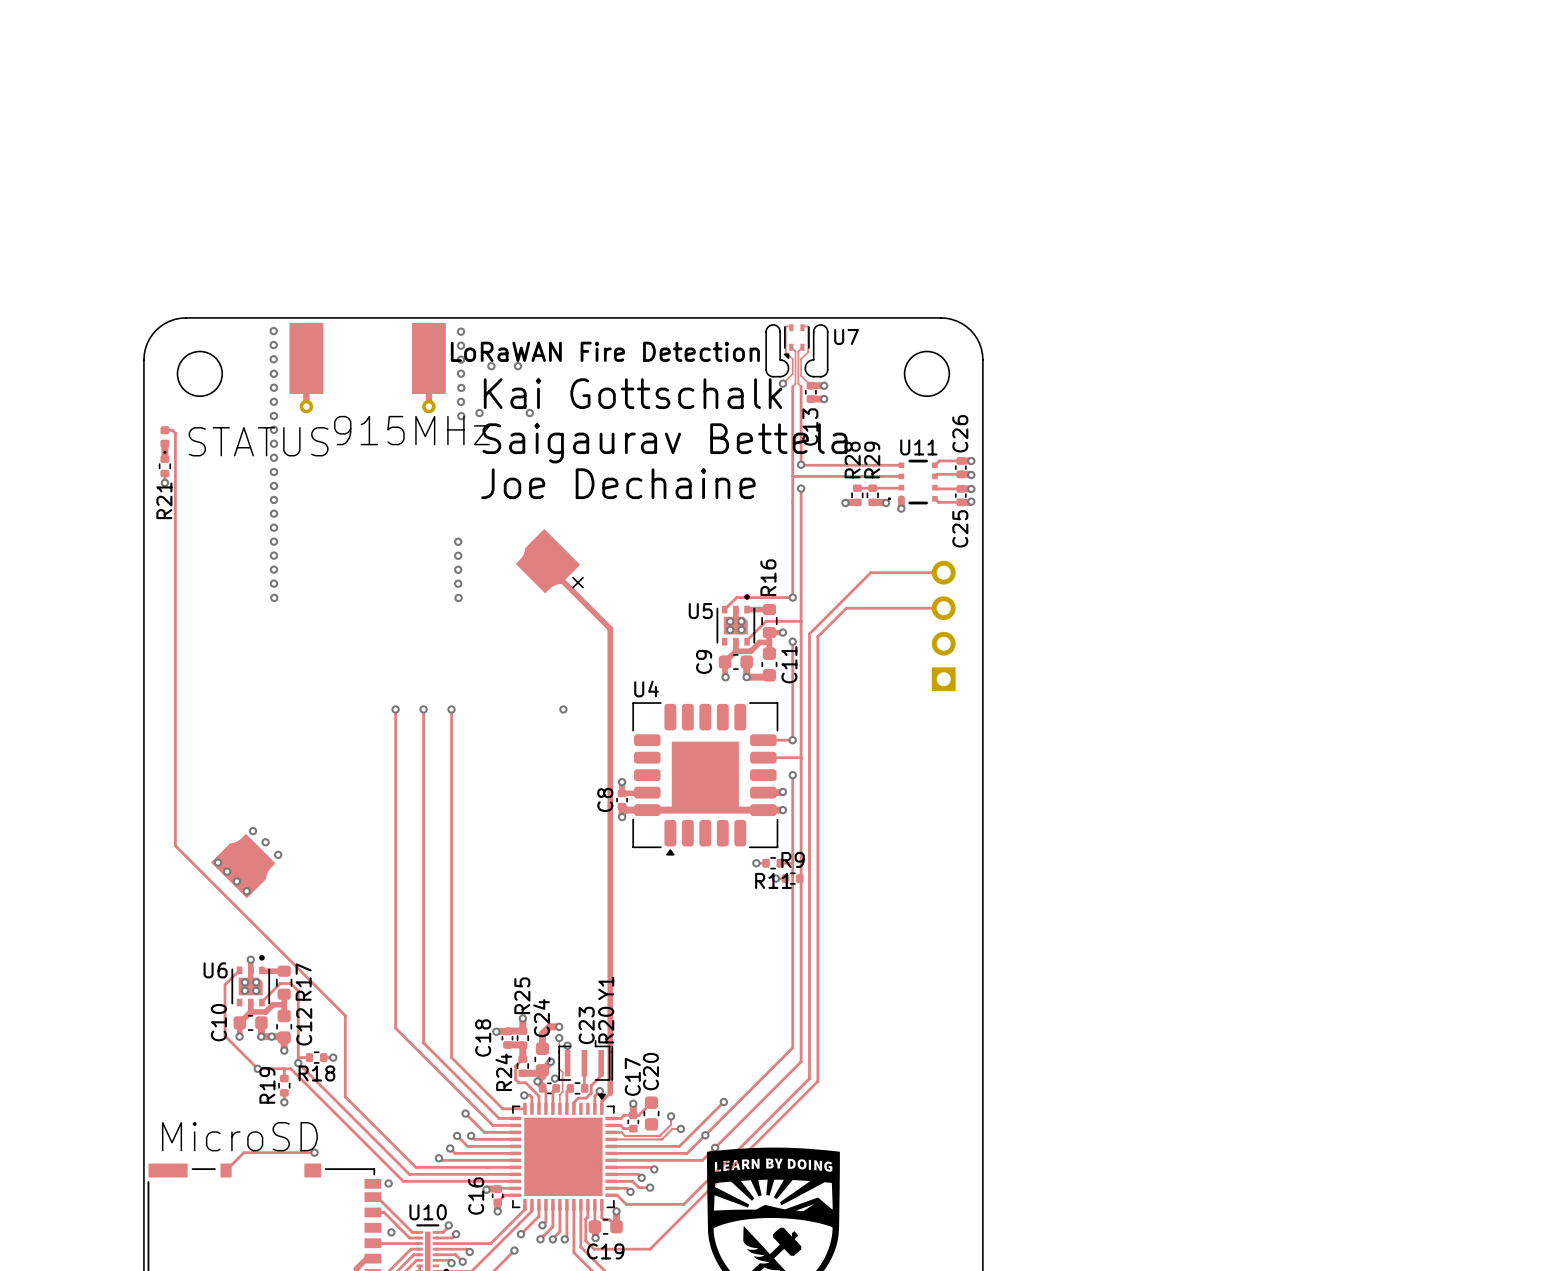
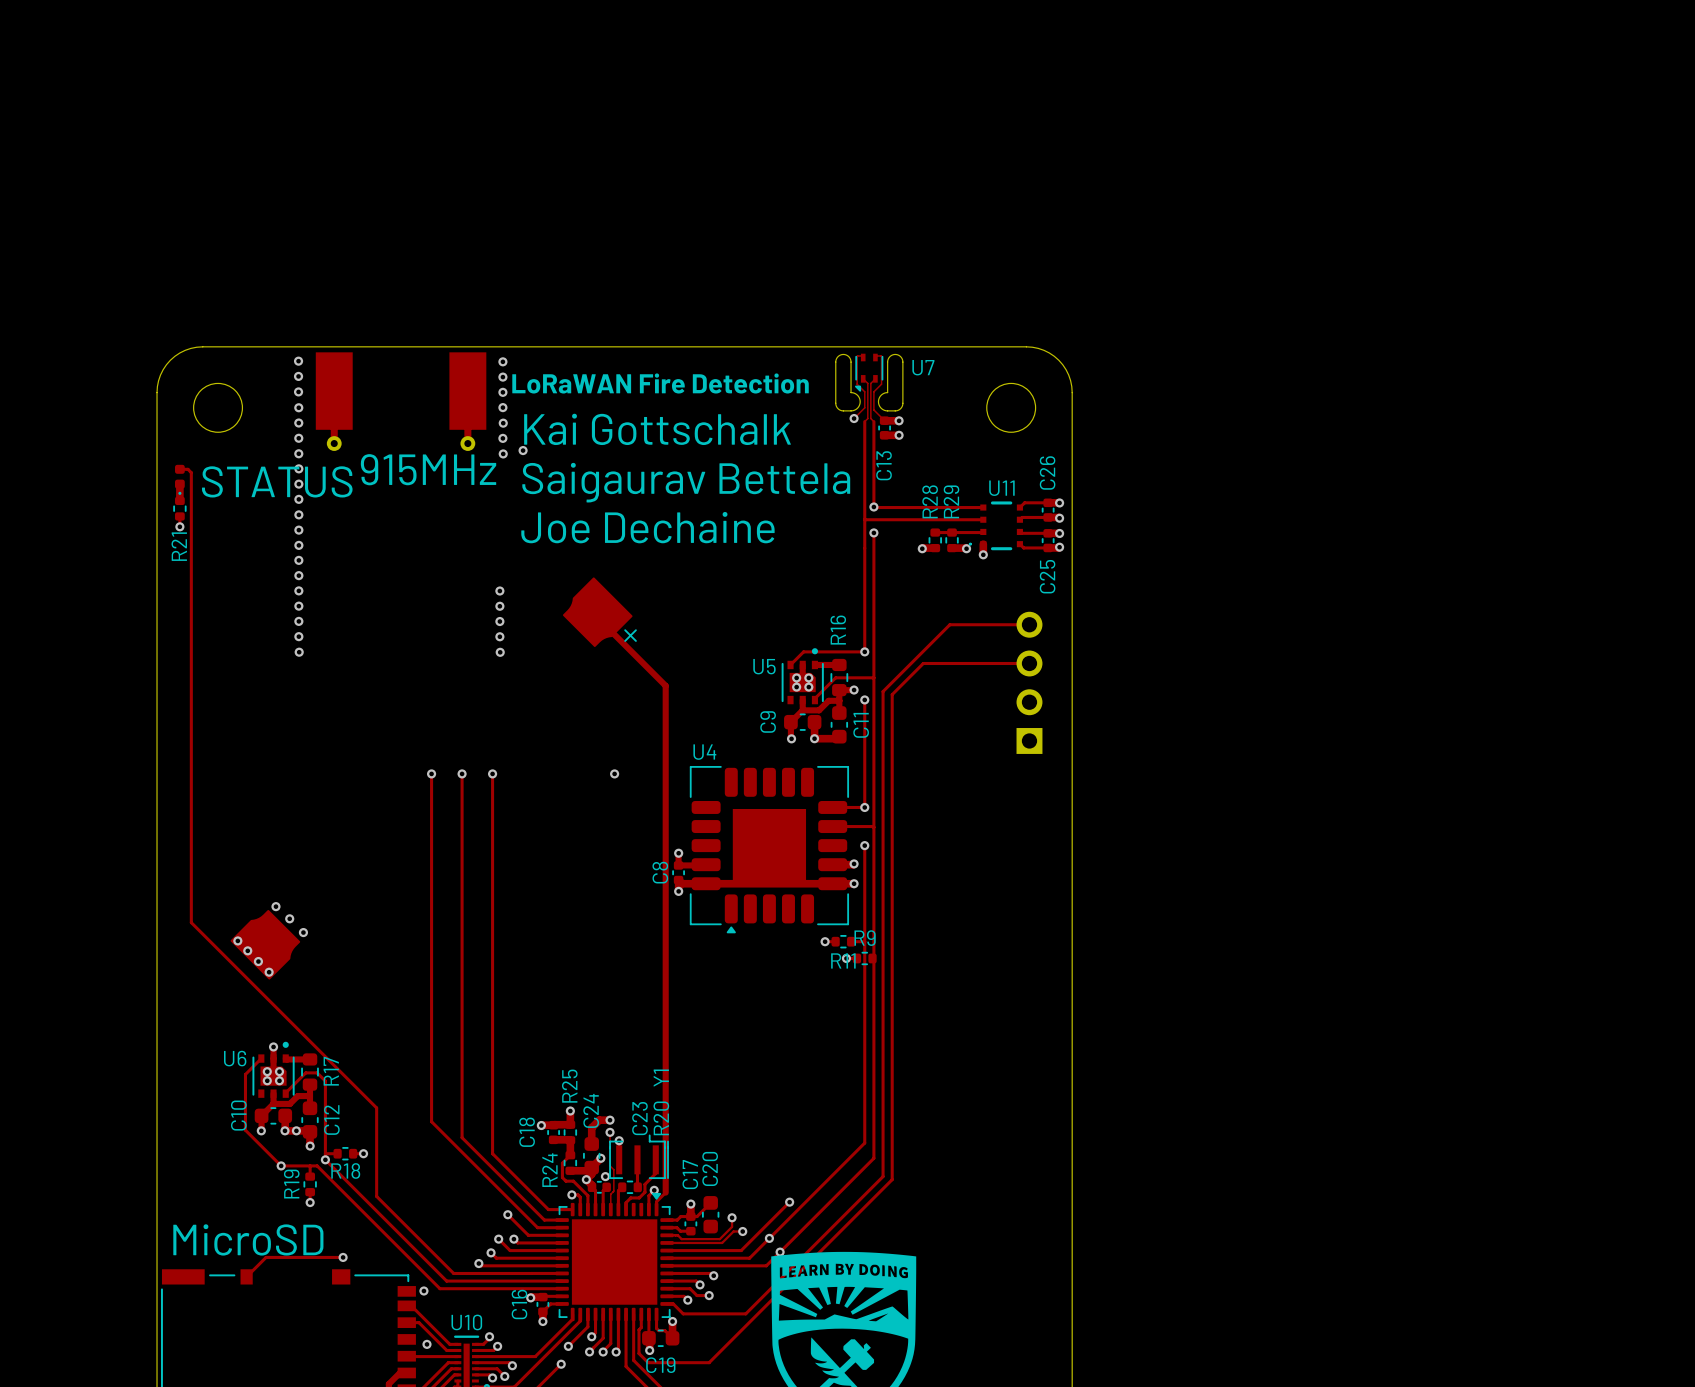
via: (491, 366) -> none
via: (517, 366) -> none
via: (529, 413) -> none

